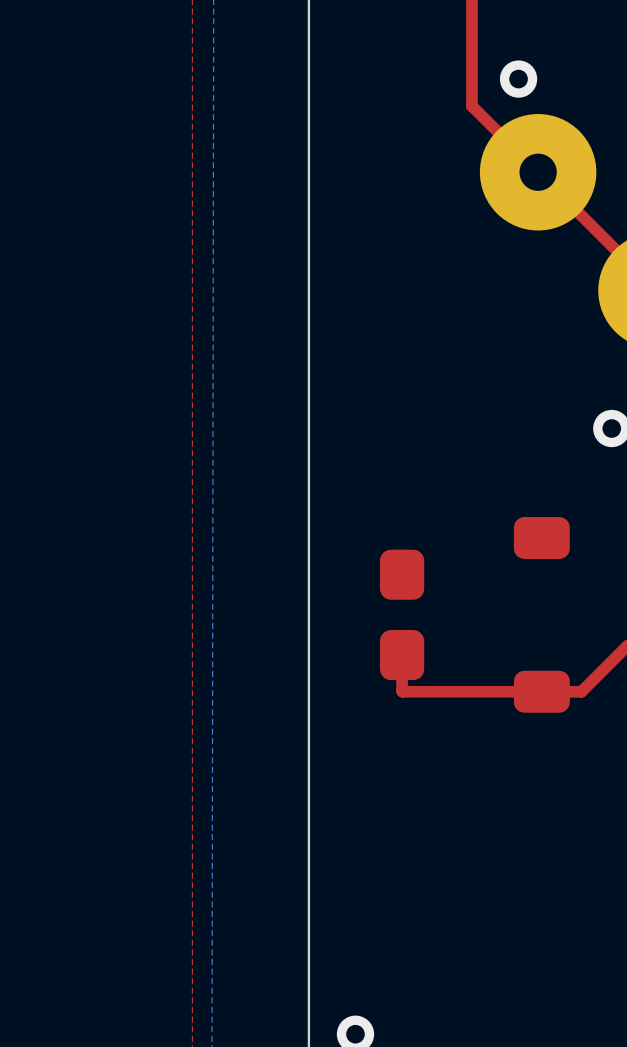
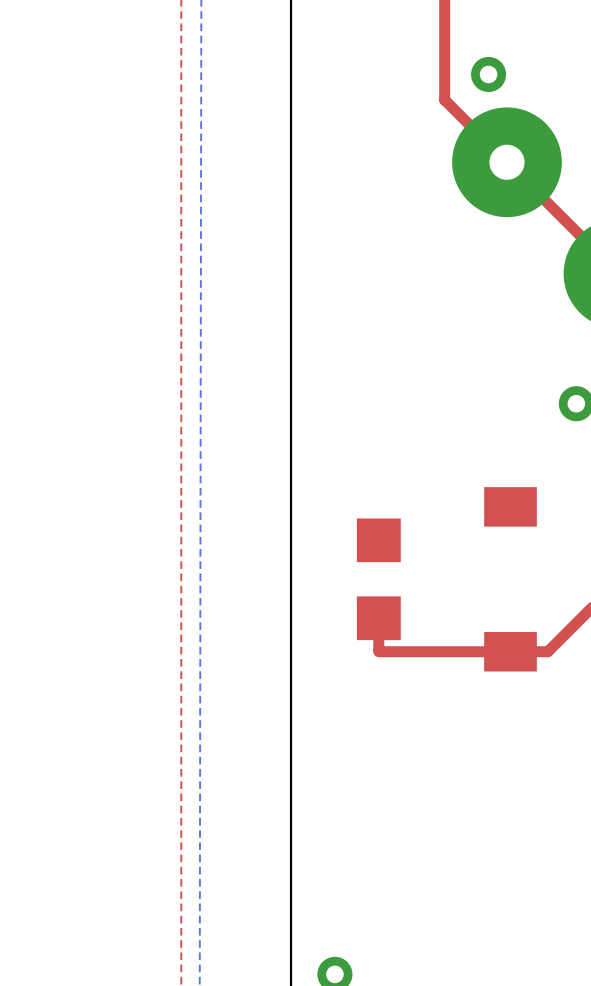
part footprint: [513, 517, 570, 713] -> [484, 487, 537, 672]
part footprint: [379, 549, 425, 681] -> [356, 518, 401, 641]

